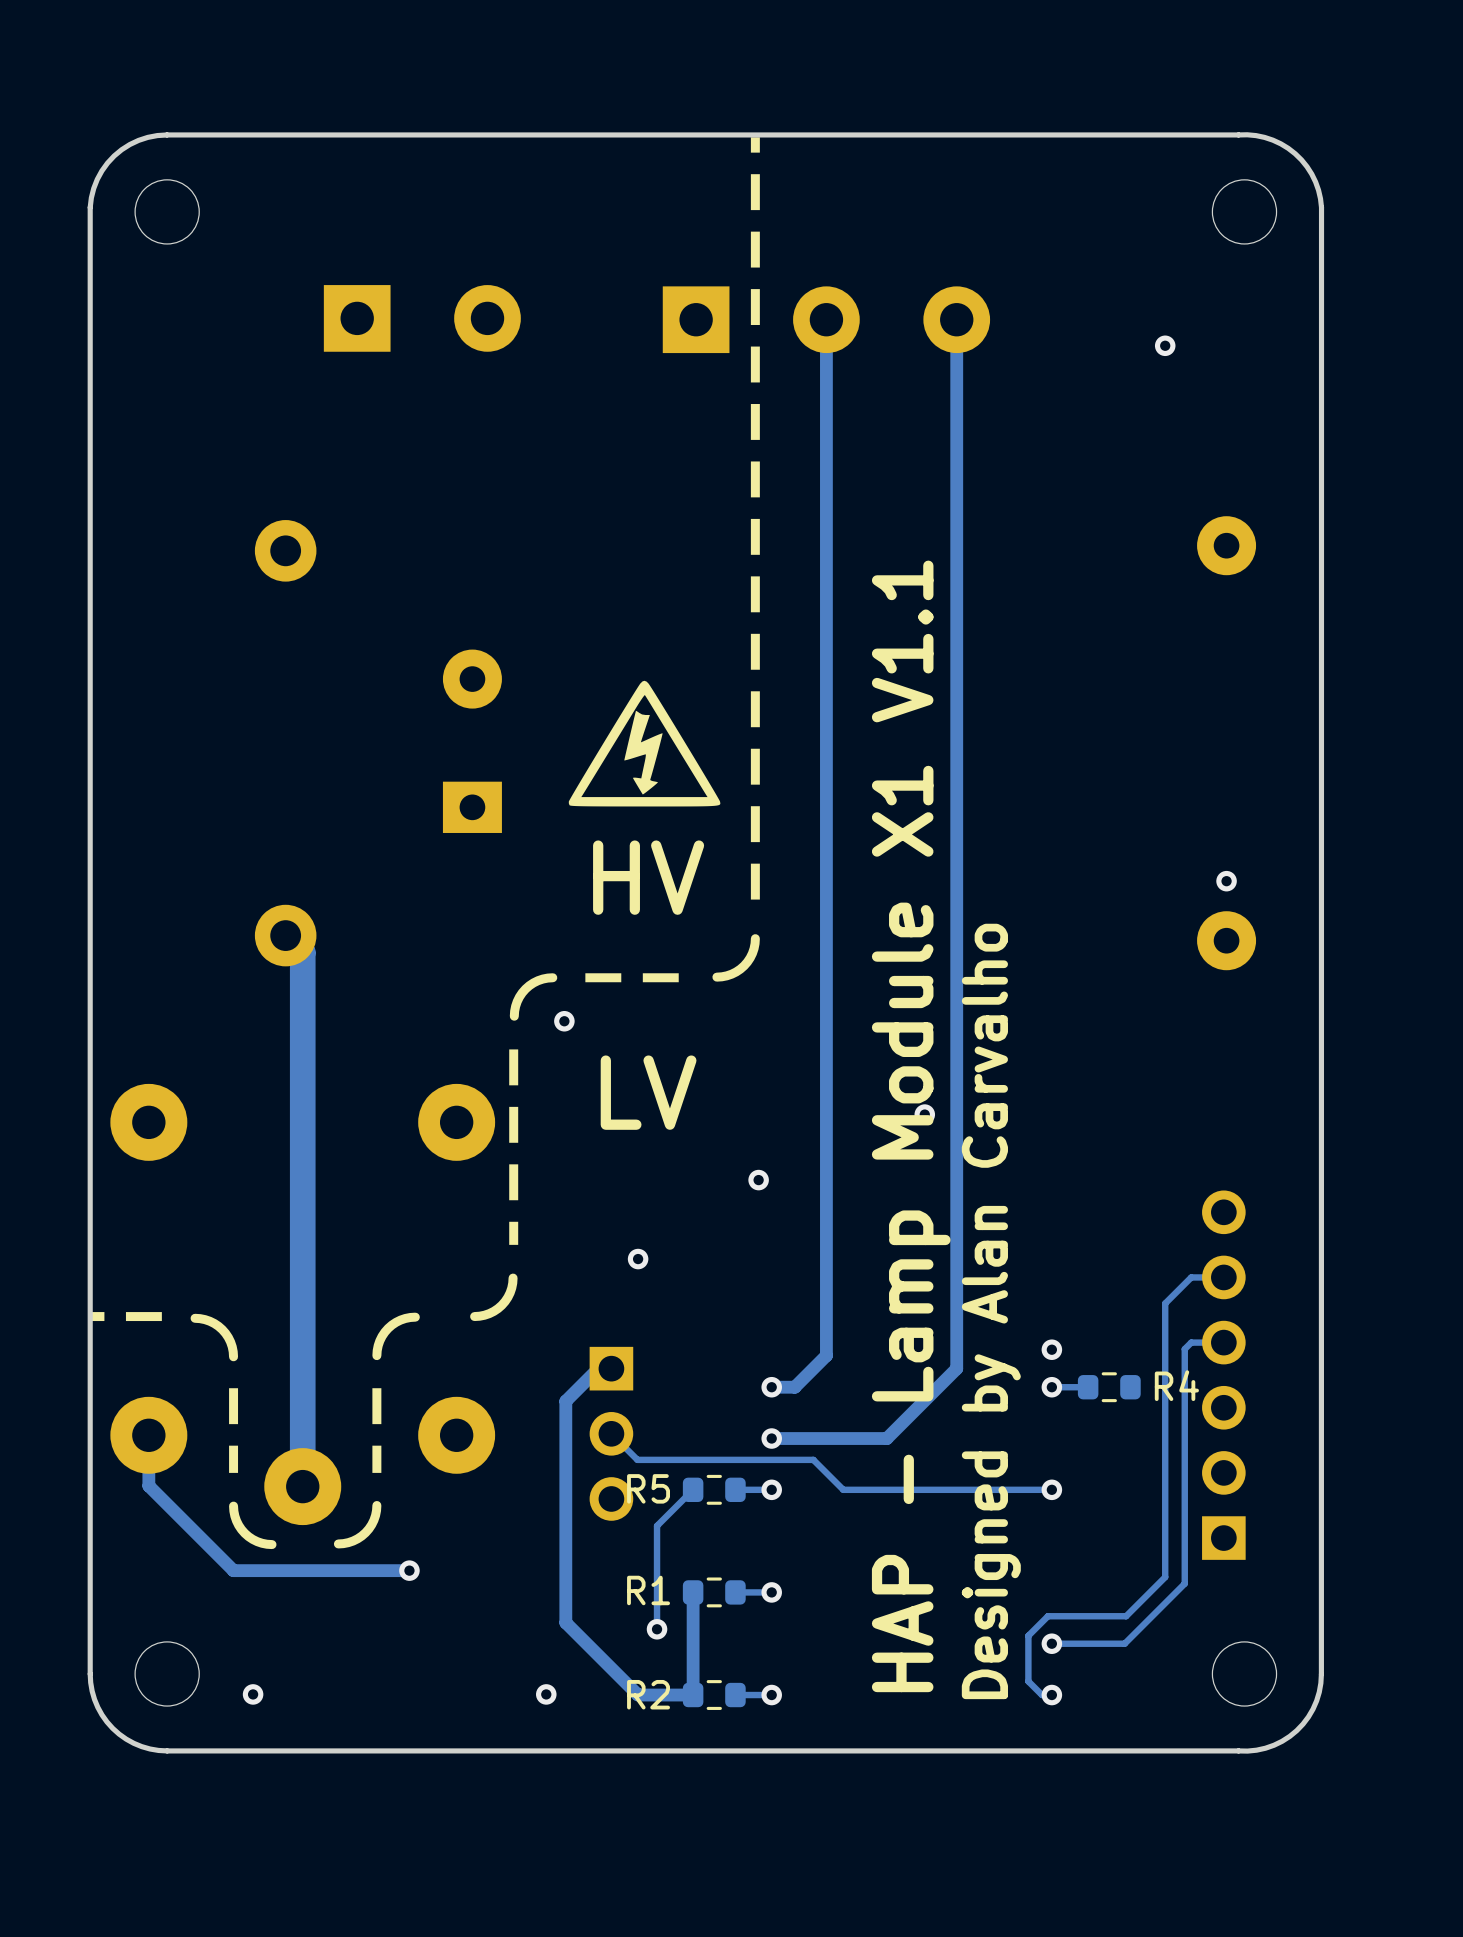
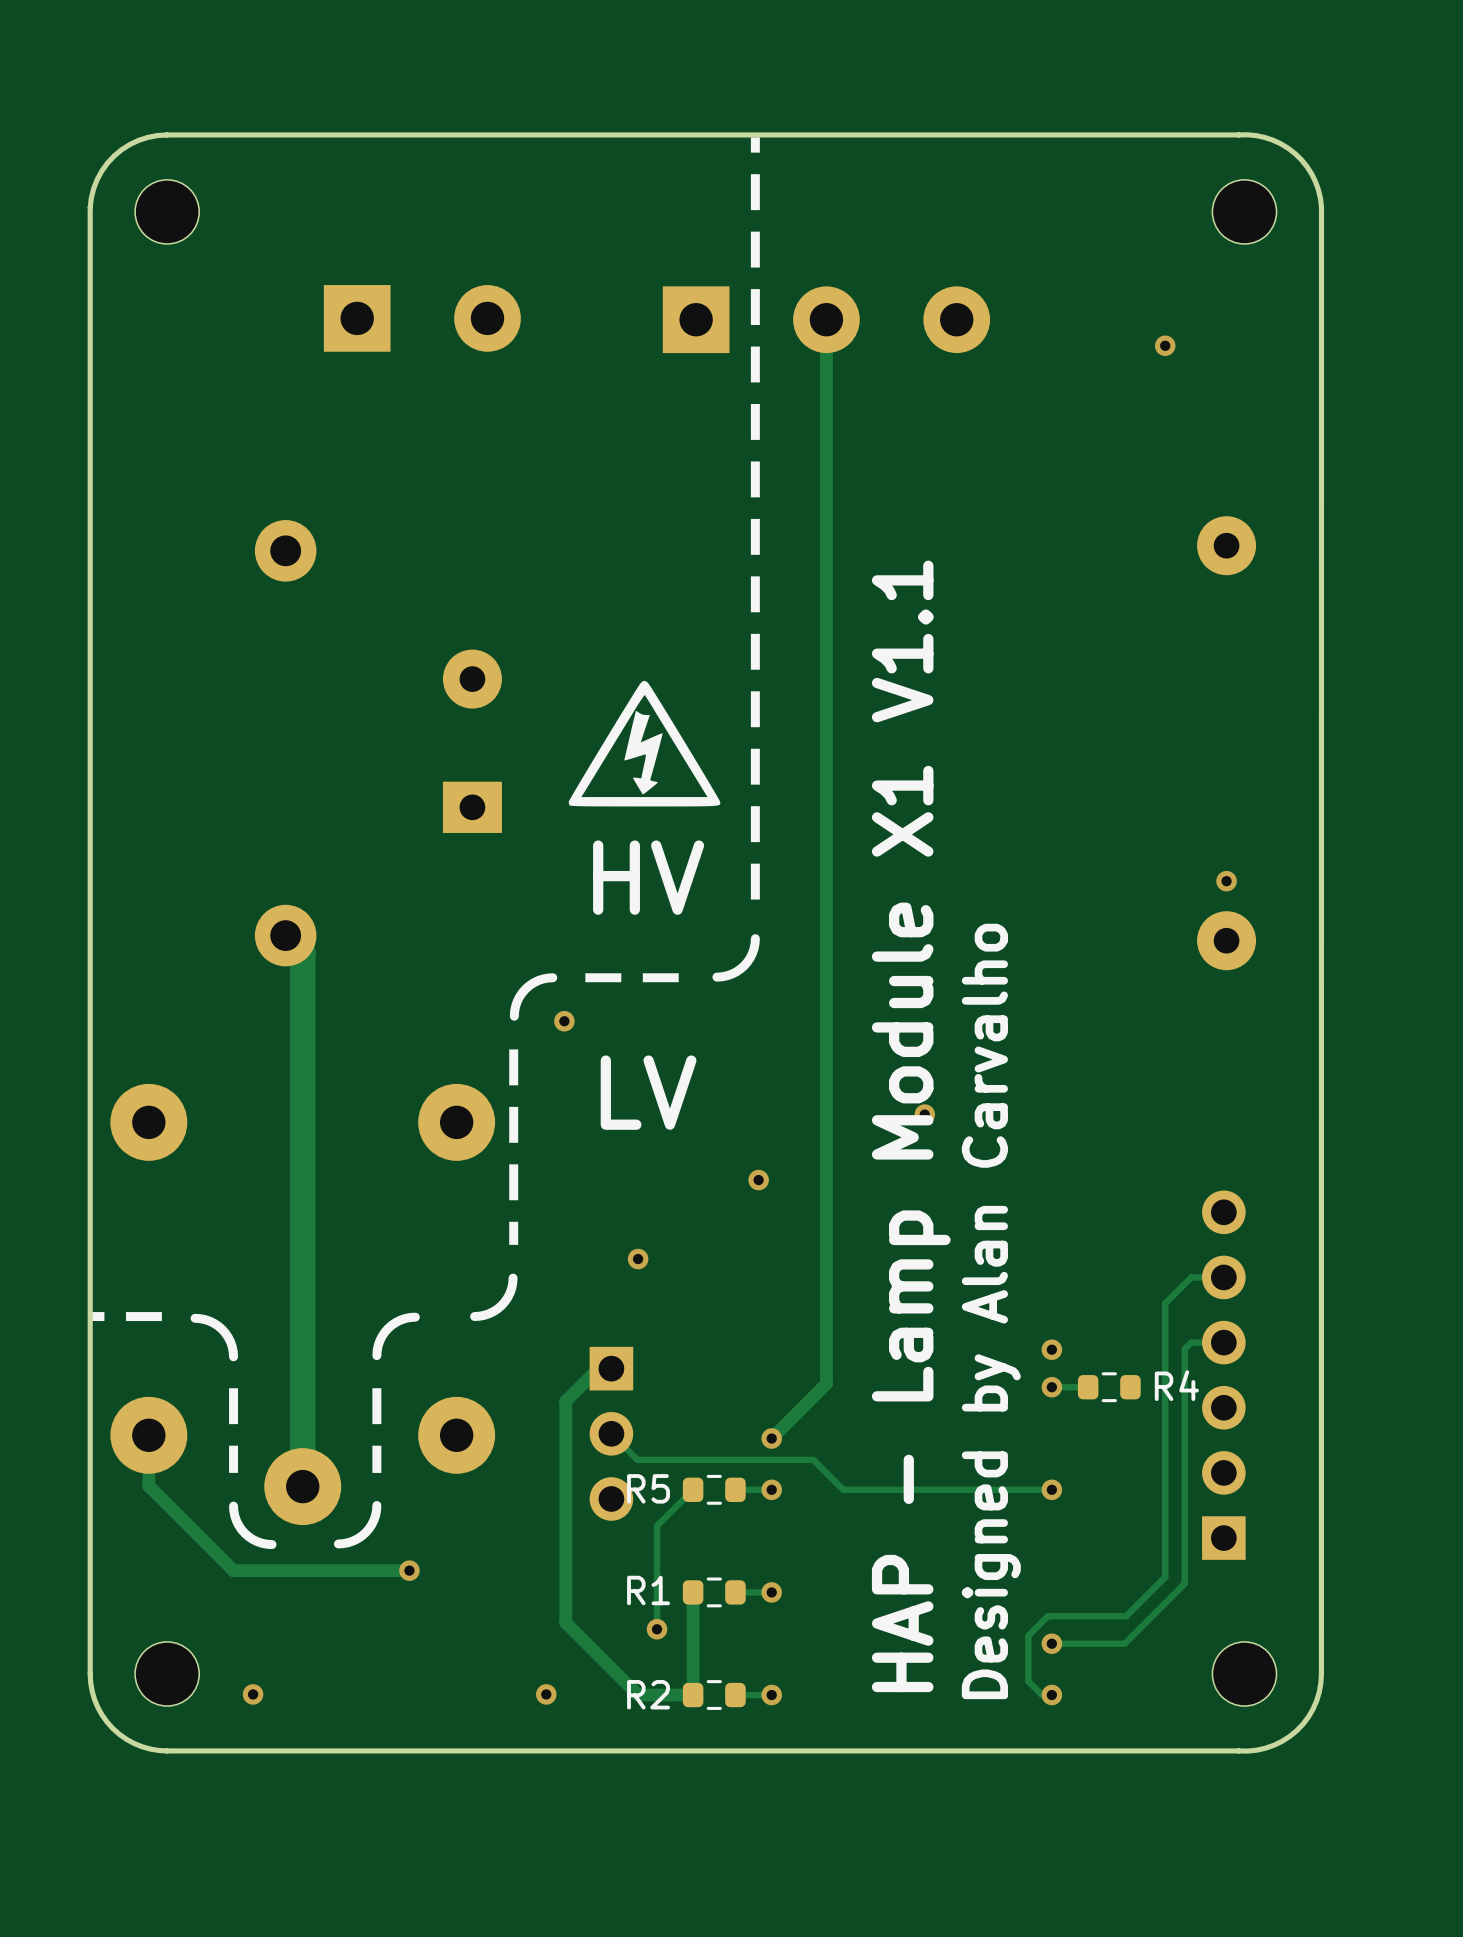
track: (956, 319) (956, 1368) (886, 1438) (771, 1438) -> none
track: (826, 1355) (794, 1387) (771, 1387) -> (826, 1355) (826, 1383) (771, 1438)
via: (771, 1387) -> none

